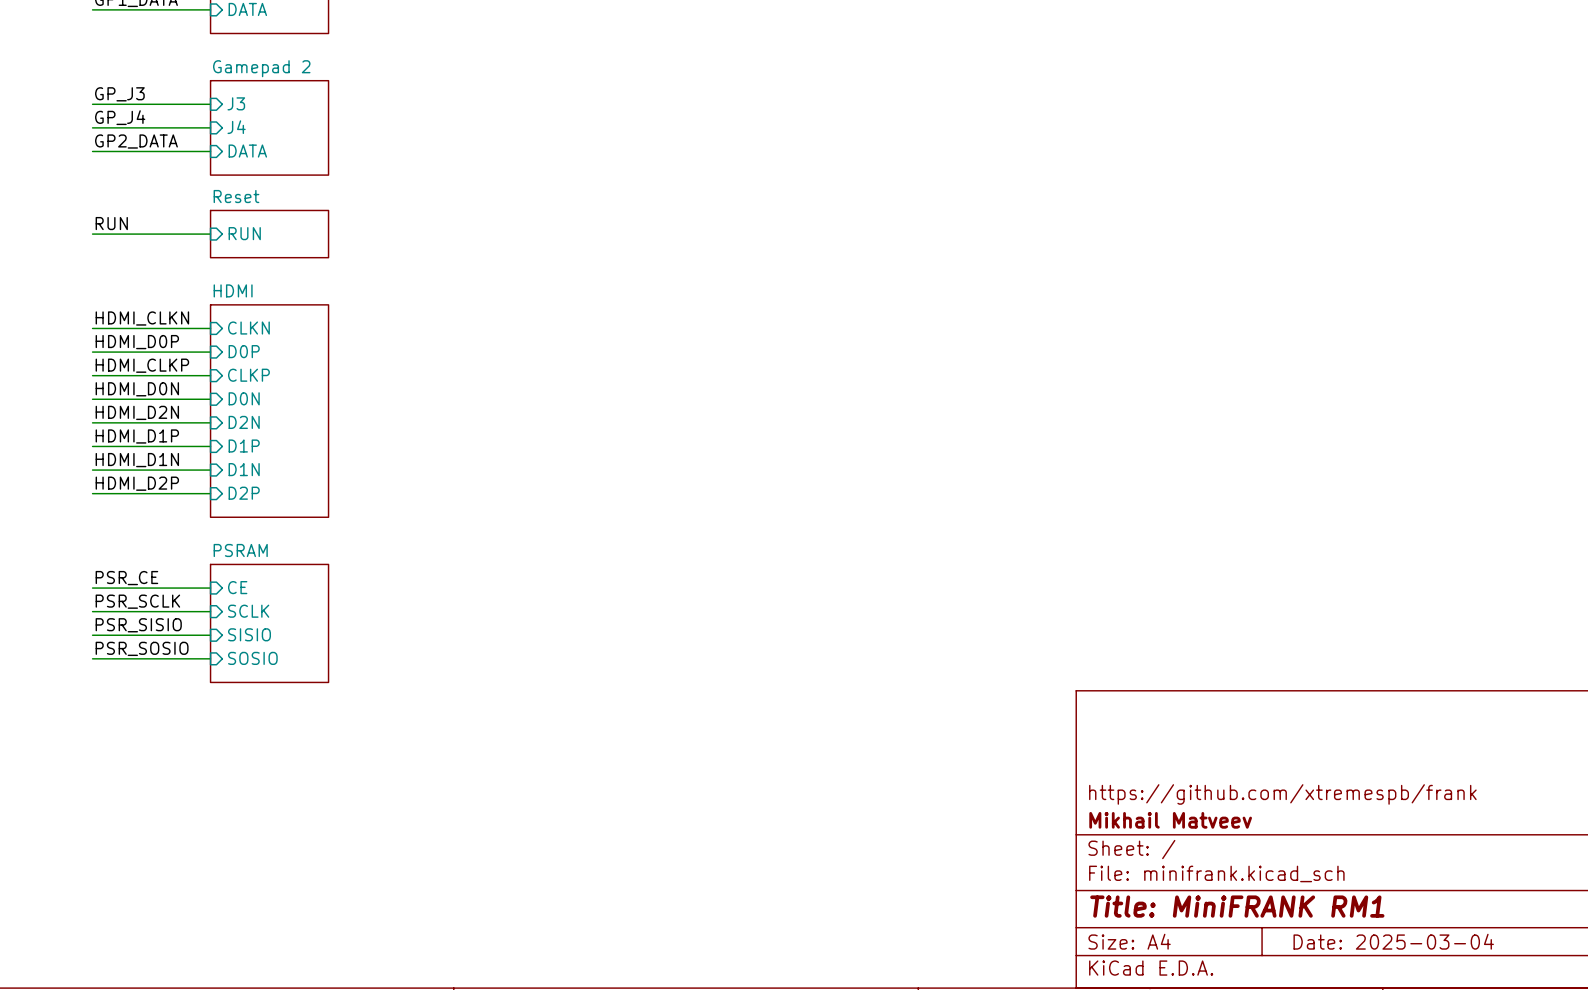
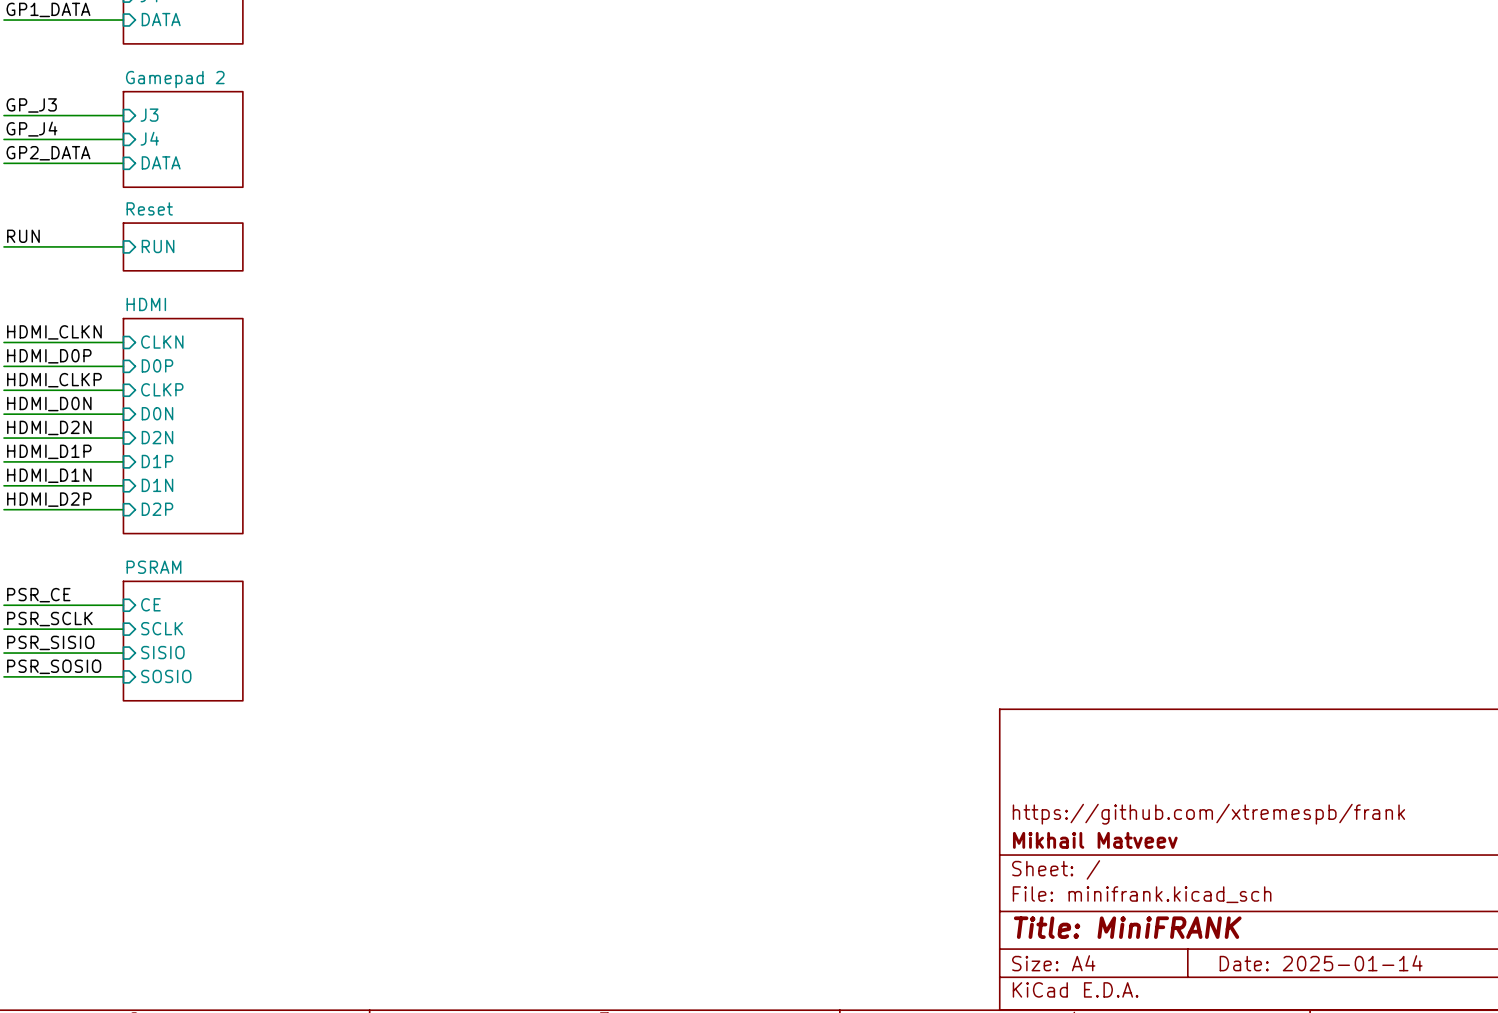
title block: Title: MiniFRANK RM1 (1237, 906) -> Title: MiniFRANK (1127, 927)
title block: Date: 2025-03-04 (1393, 941) -> Date: 2025-01-14 (1321, 963)

